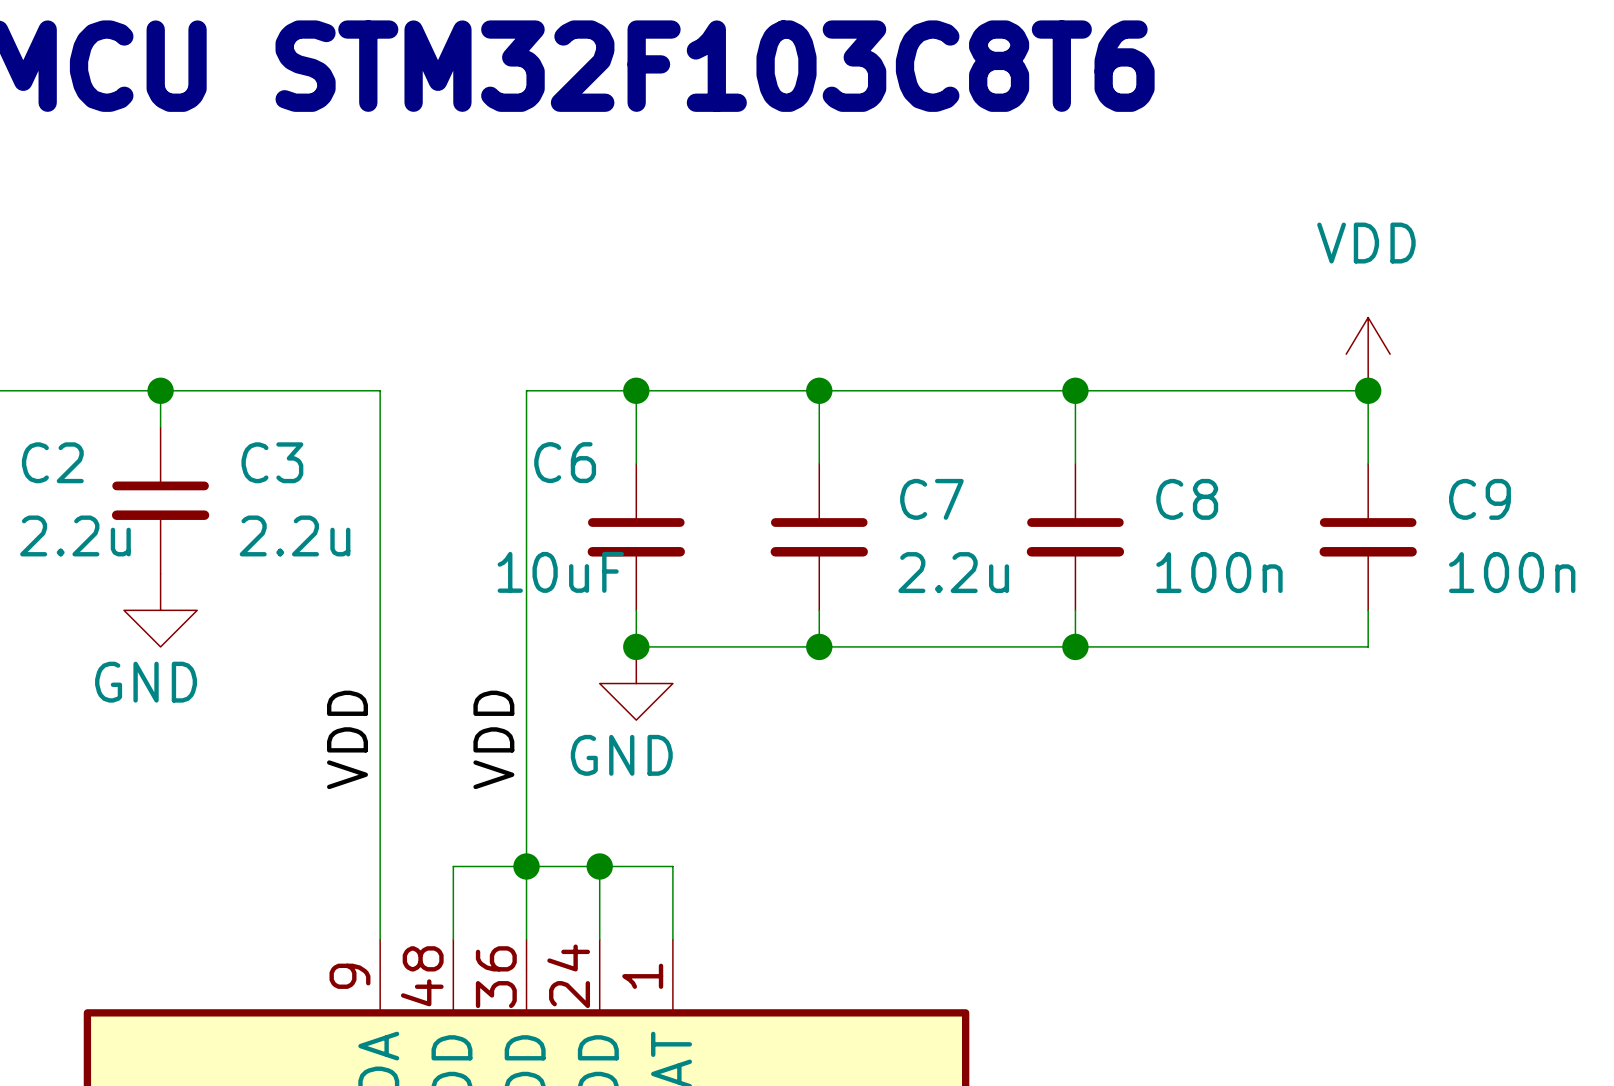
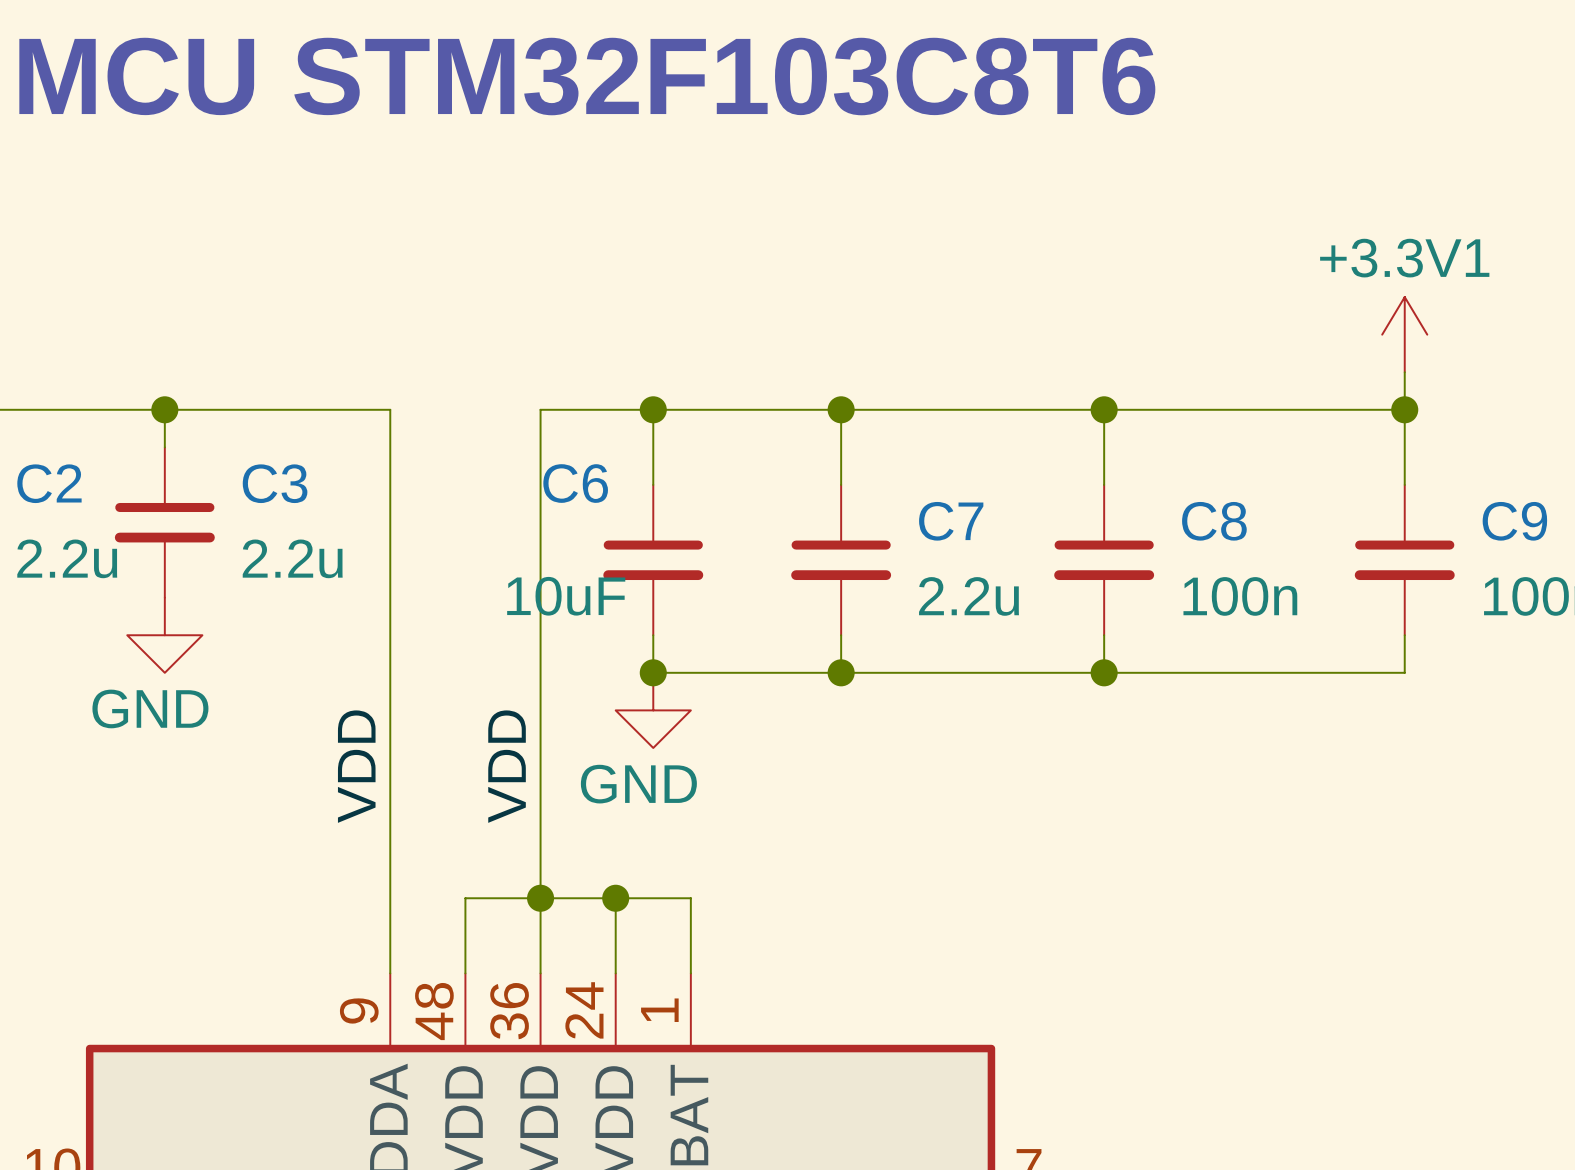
power symbol: none -> +3.3V1 (1404, 334)
power symbol: VDD (1368, 354) -> none

